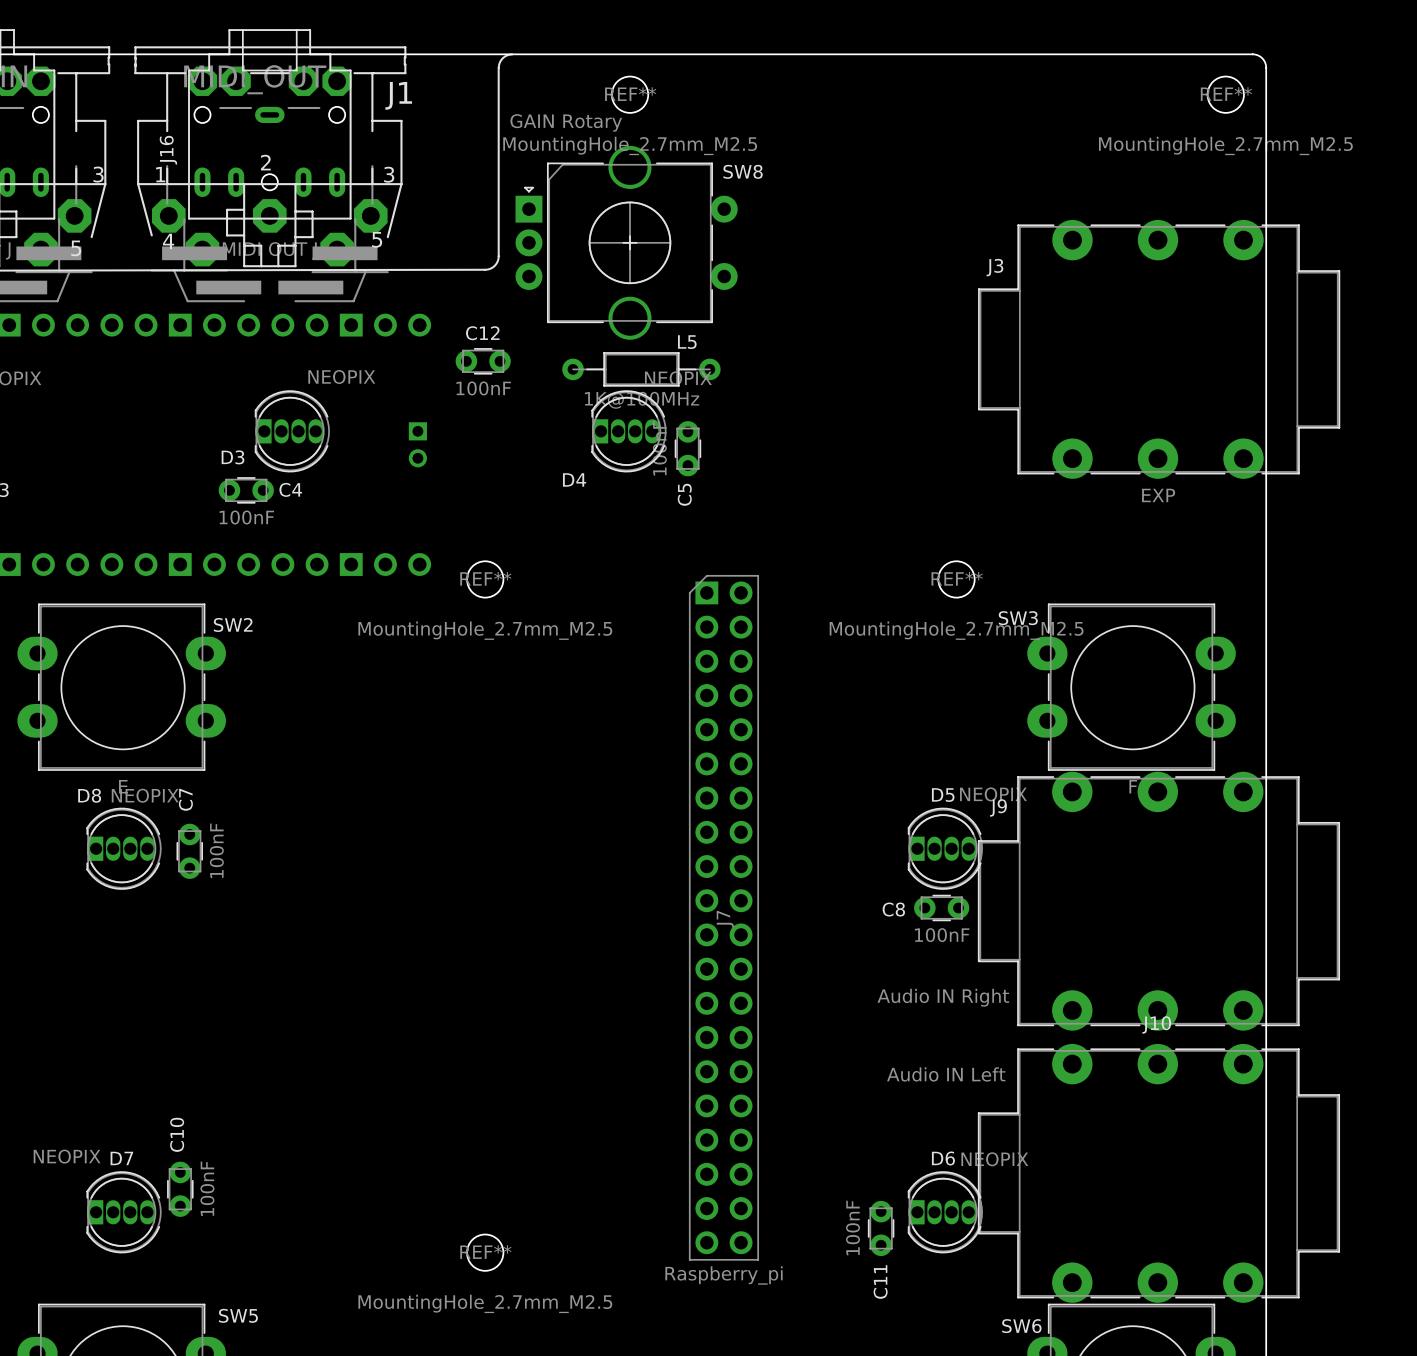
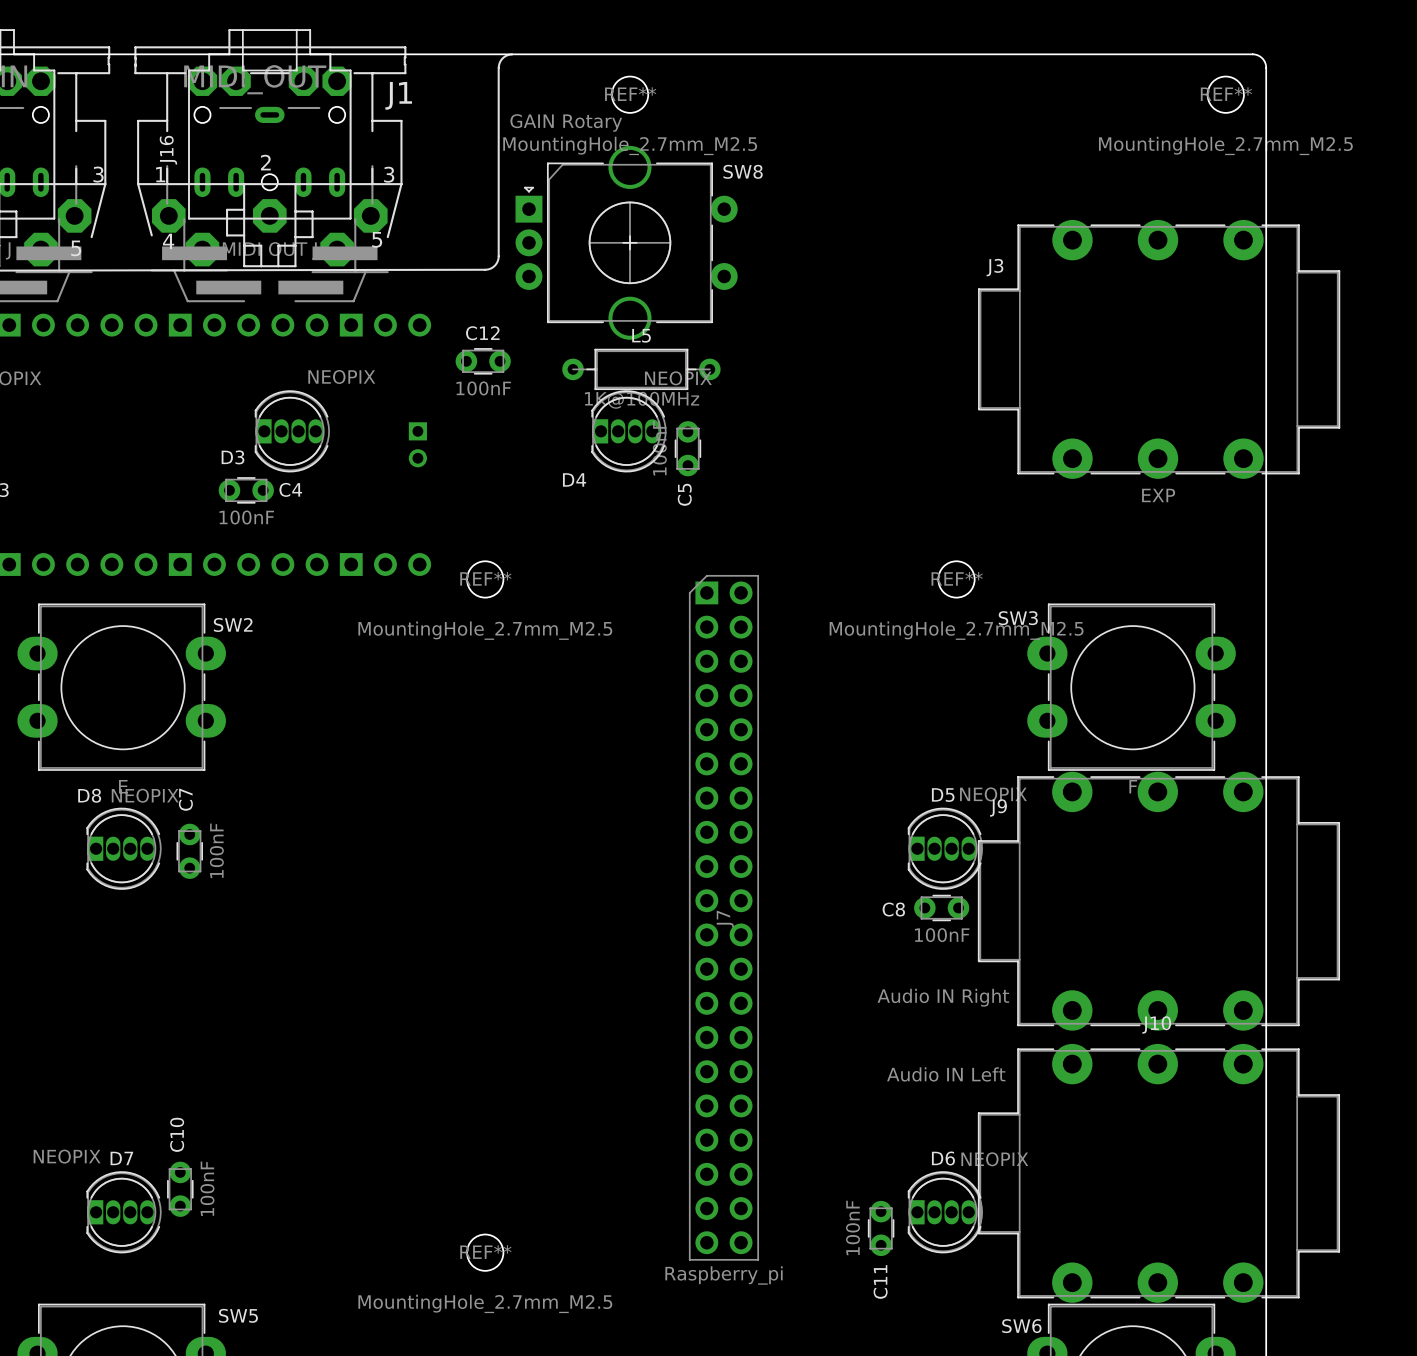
L5 name position: L5 (687, 342) -> L5 (641, 335)
L5 footprint: [562, 352, 721, 387] -> [562, 348, 721, 391]

